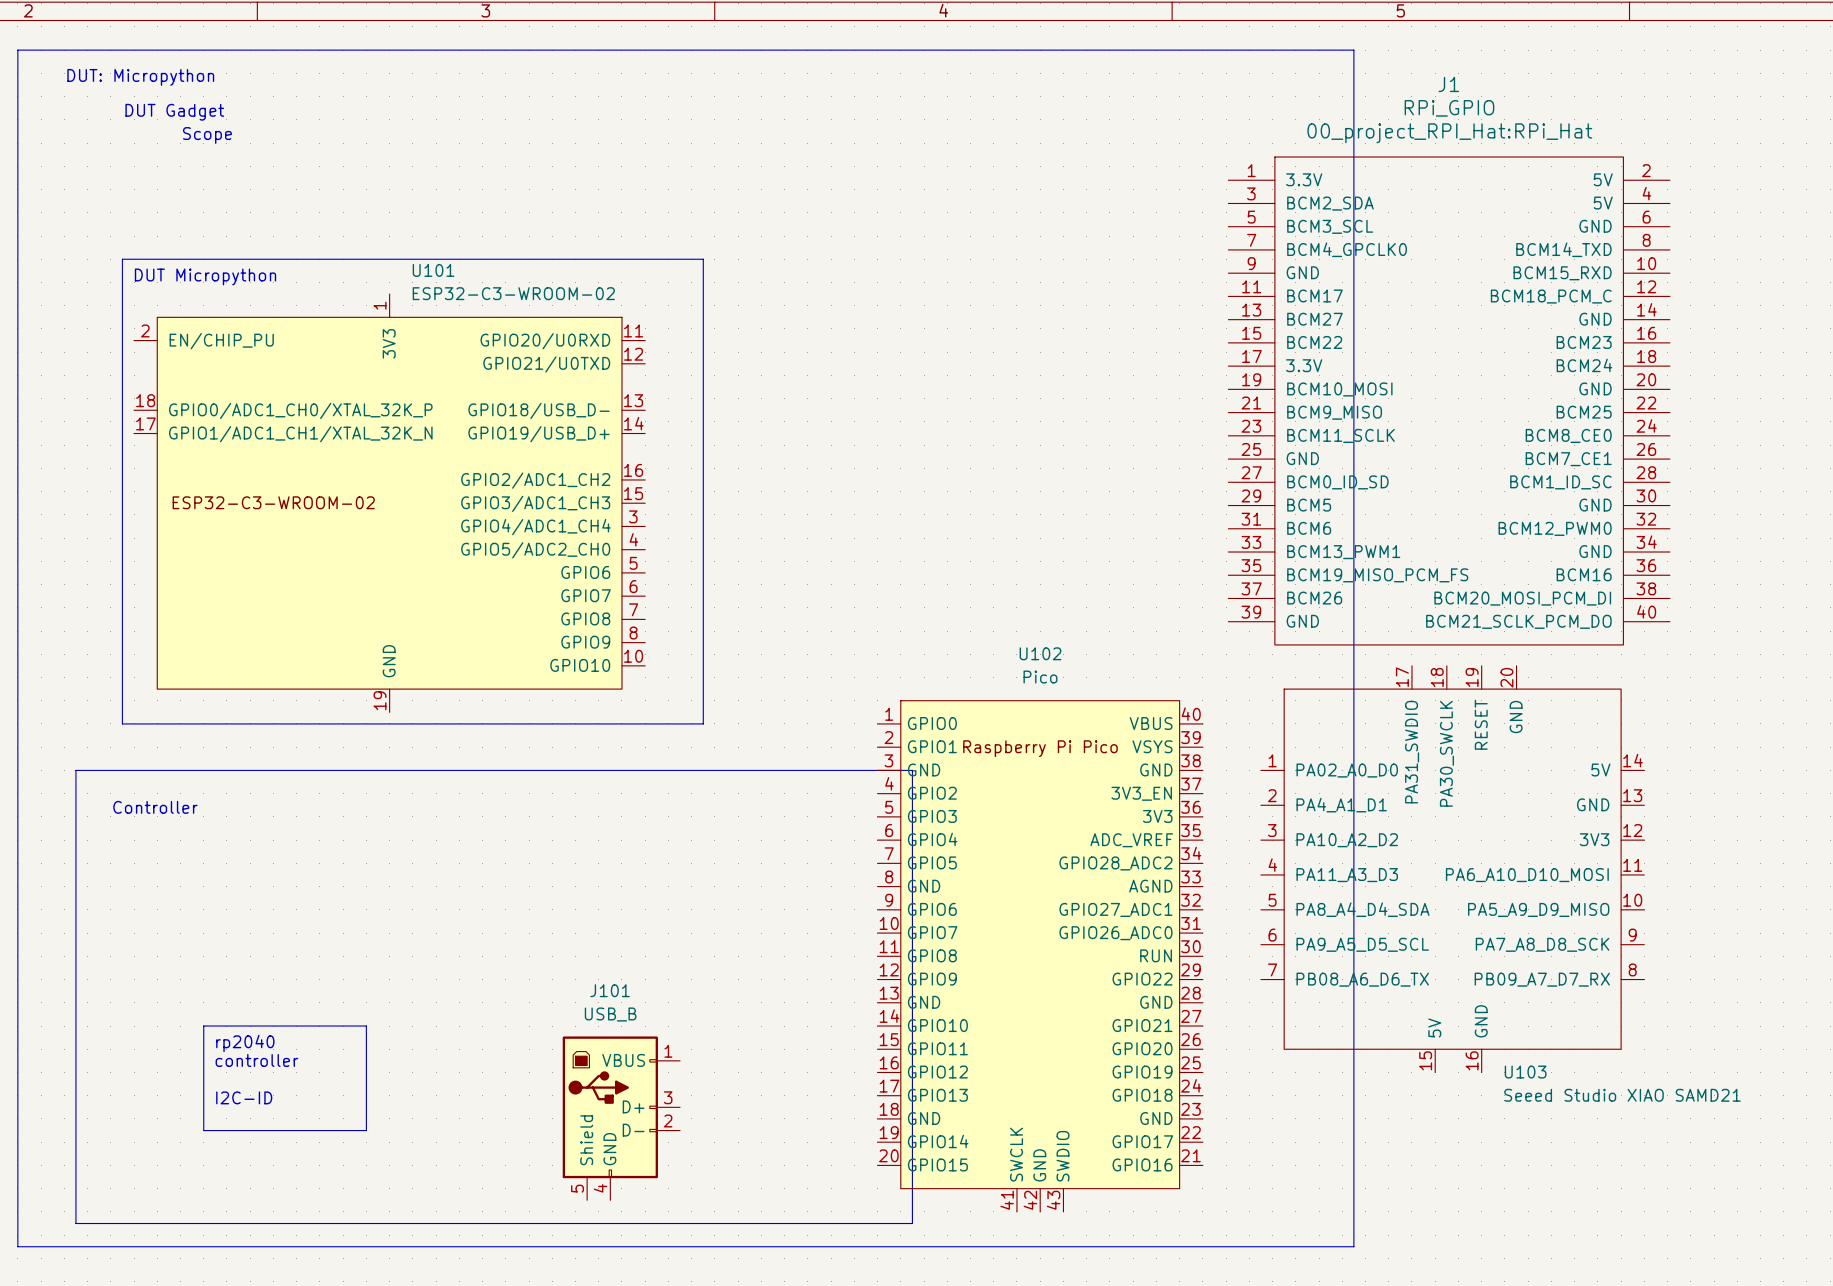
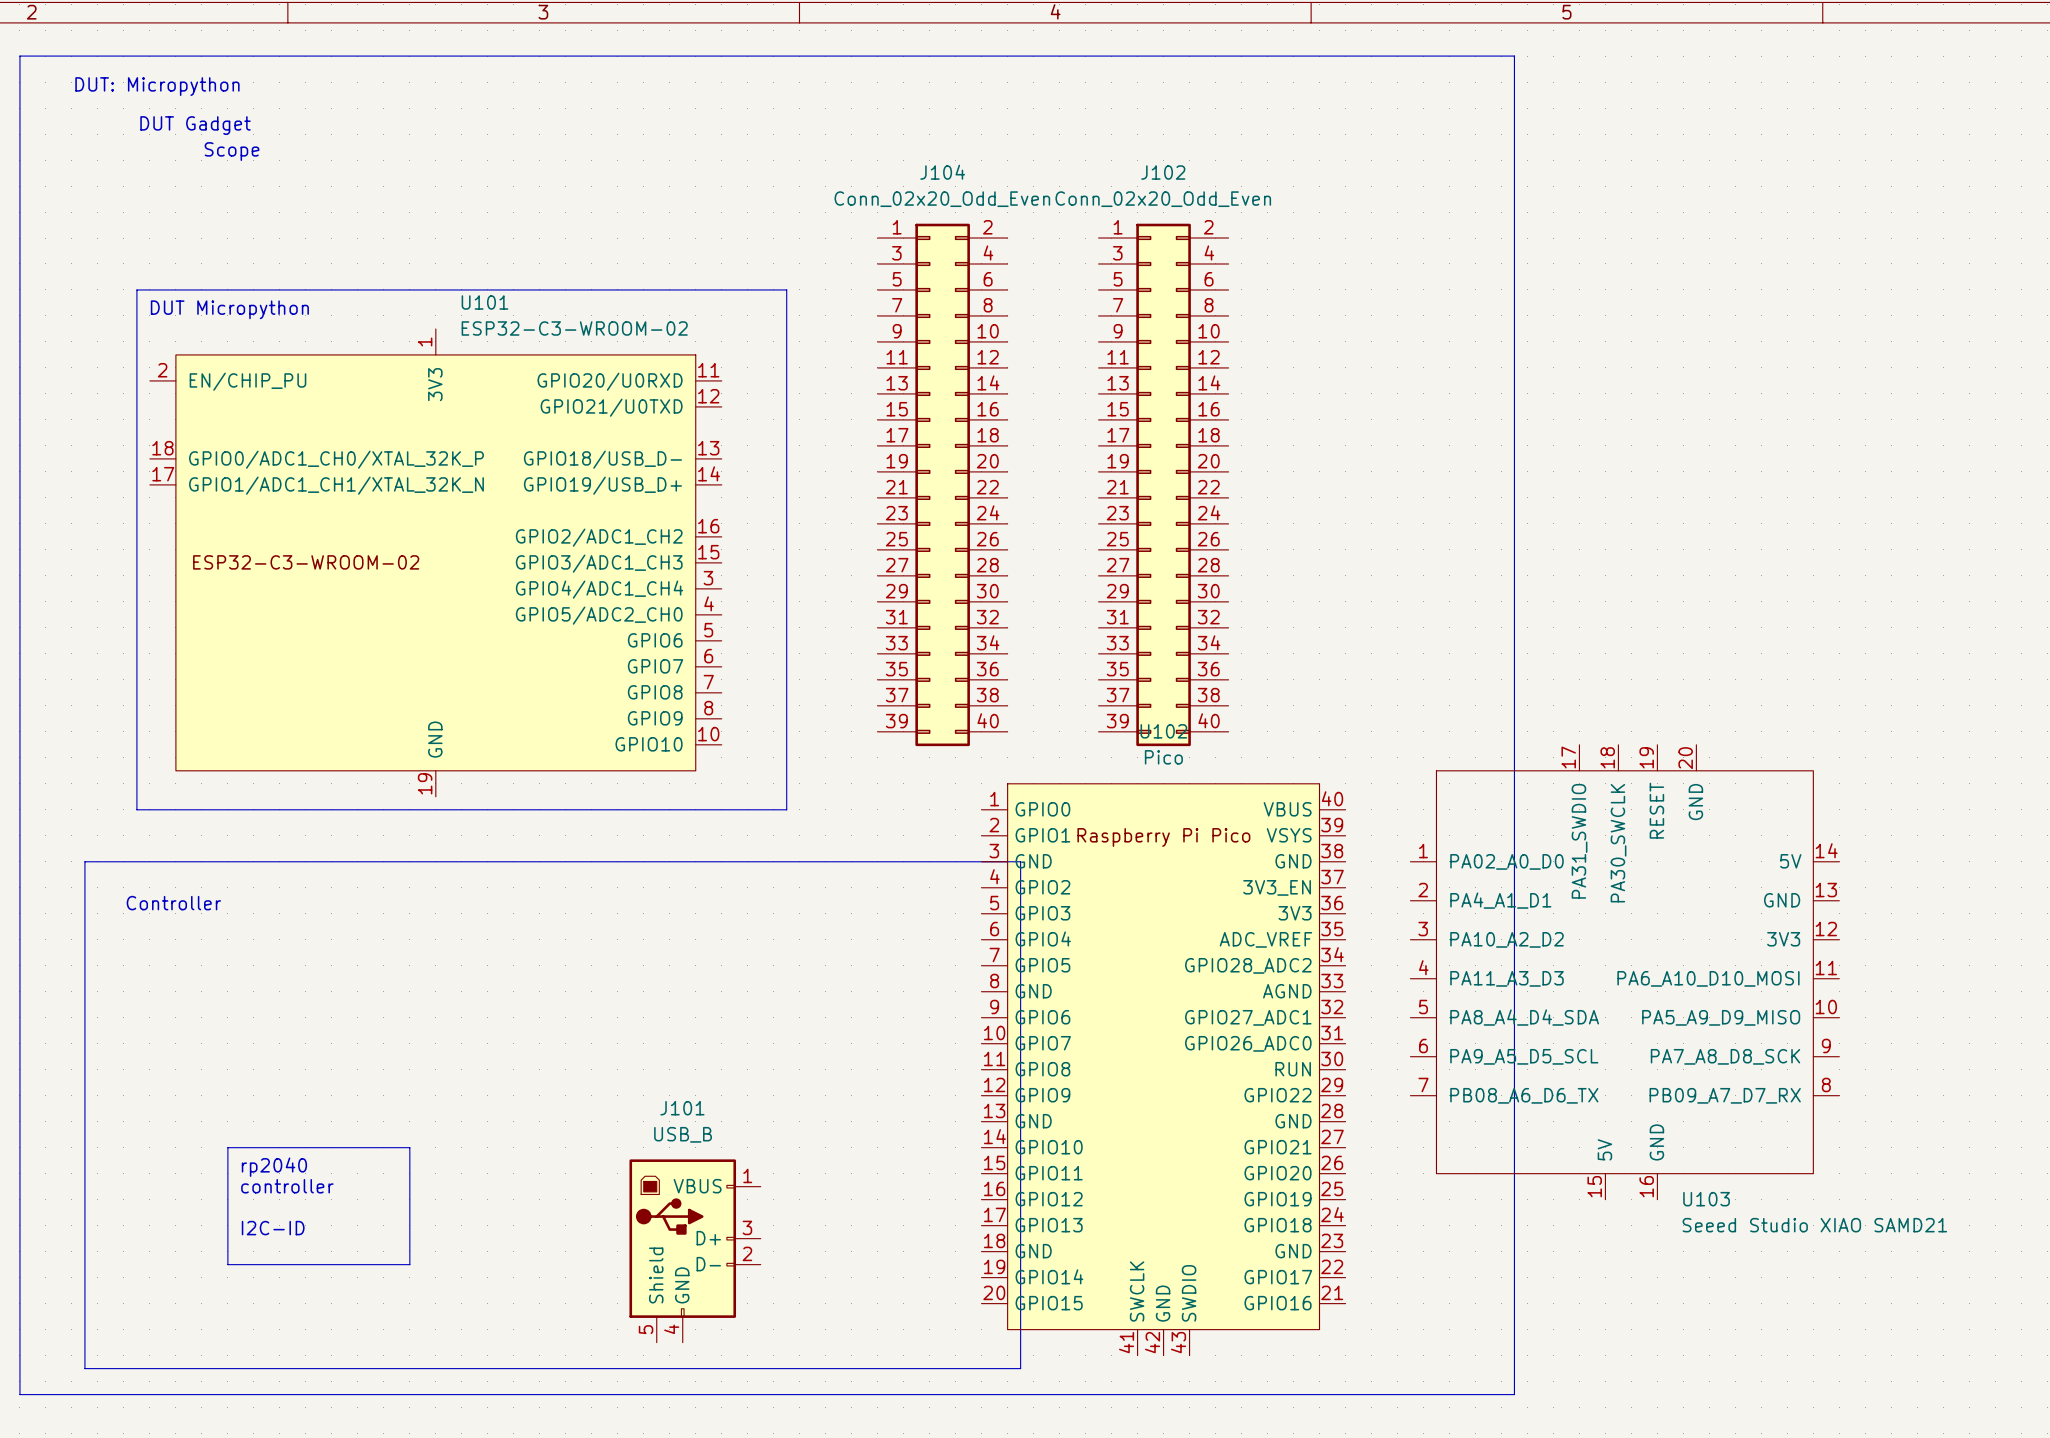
J1: RPi_GPIO (1449, 400) -> none
J104: none -> Conn_02x20_Odd_Even (942, 484)
J102: none -> Conn_02x20_Odd_Even (1163, 484)

